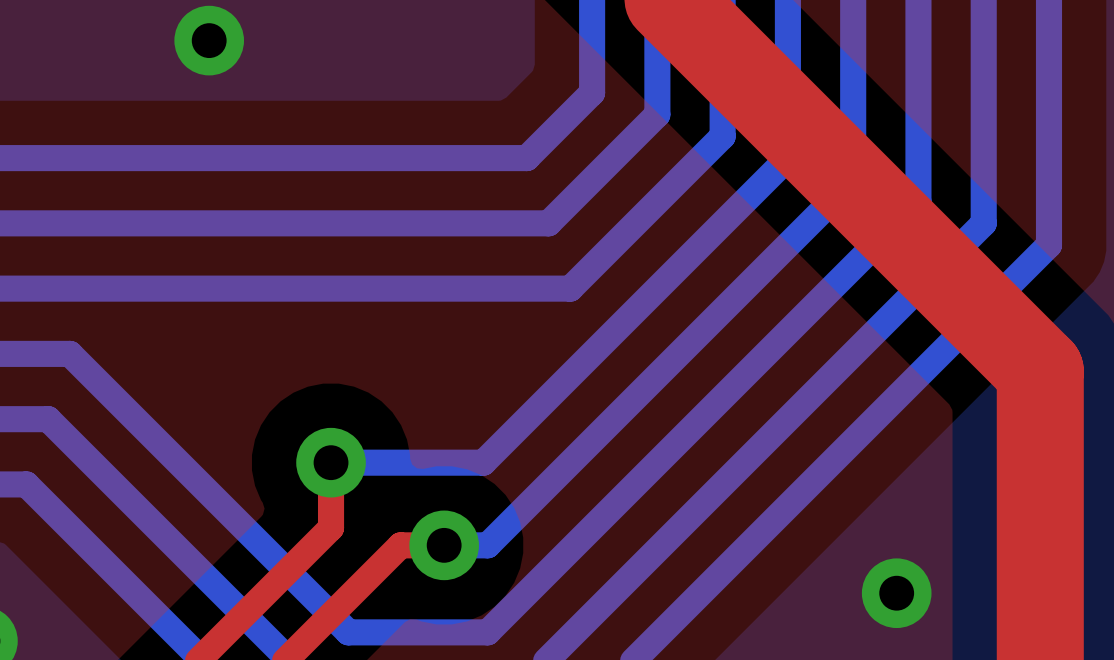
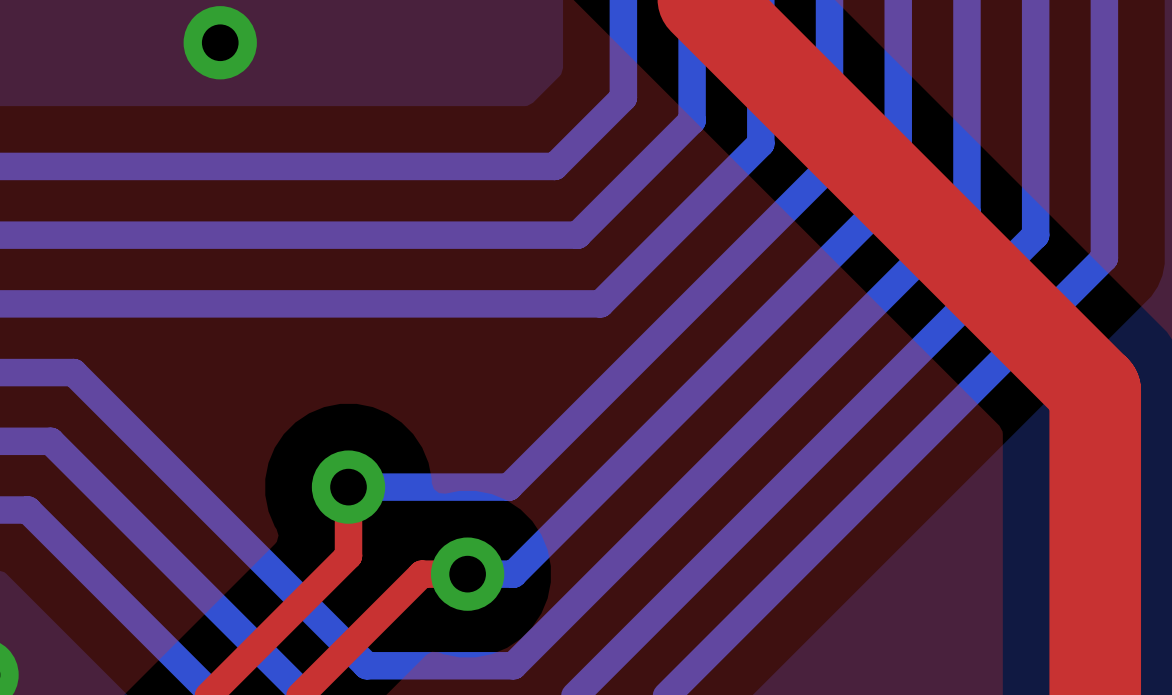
via: (896, 593) -> none

